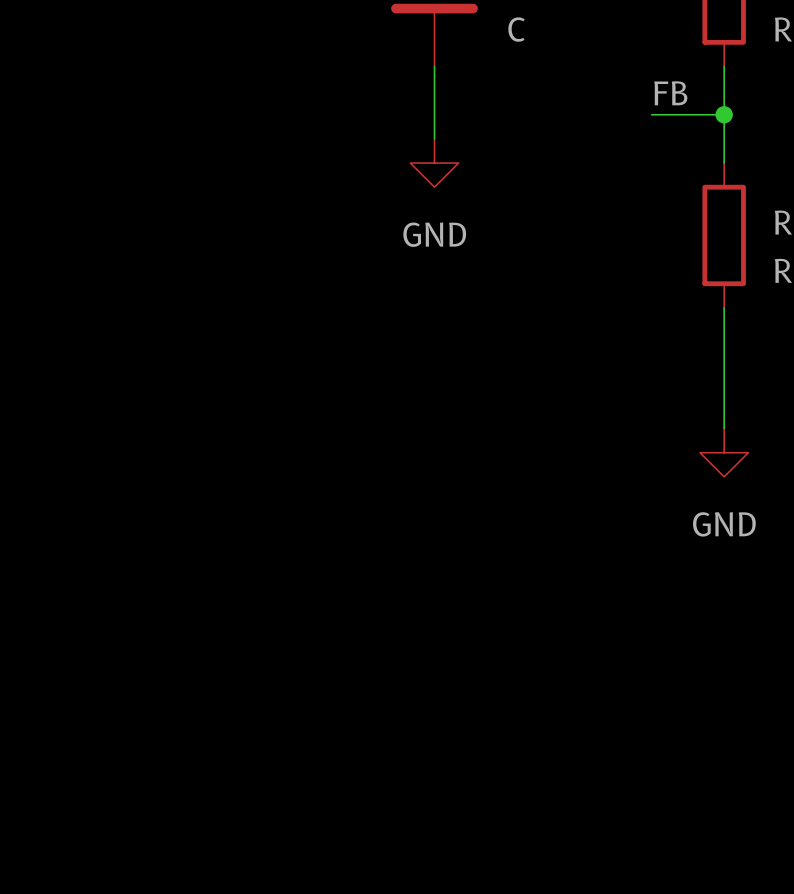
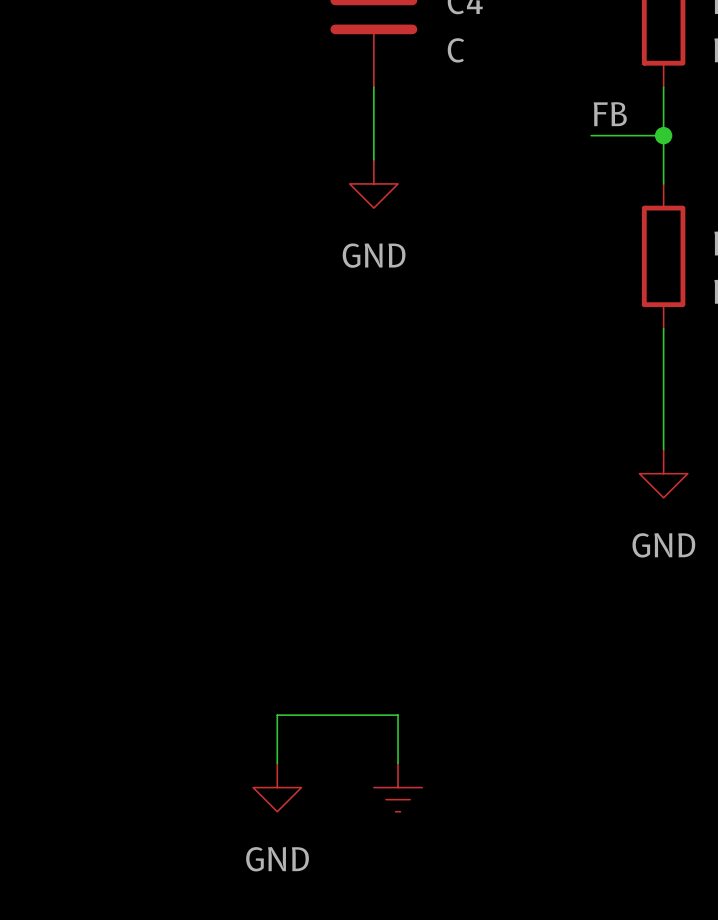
wire: none -> (277, 763) (277, 715) (398, 715) (398, 763)
power symbol: none -> GND (277, 787)
power symbol: none -> (398, 787)

